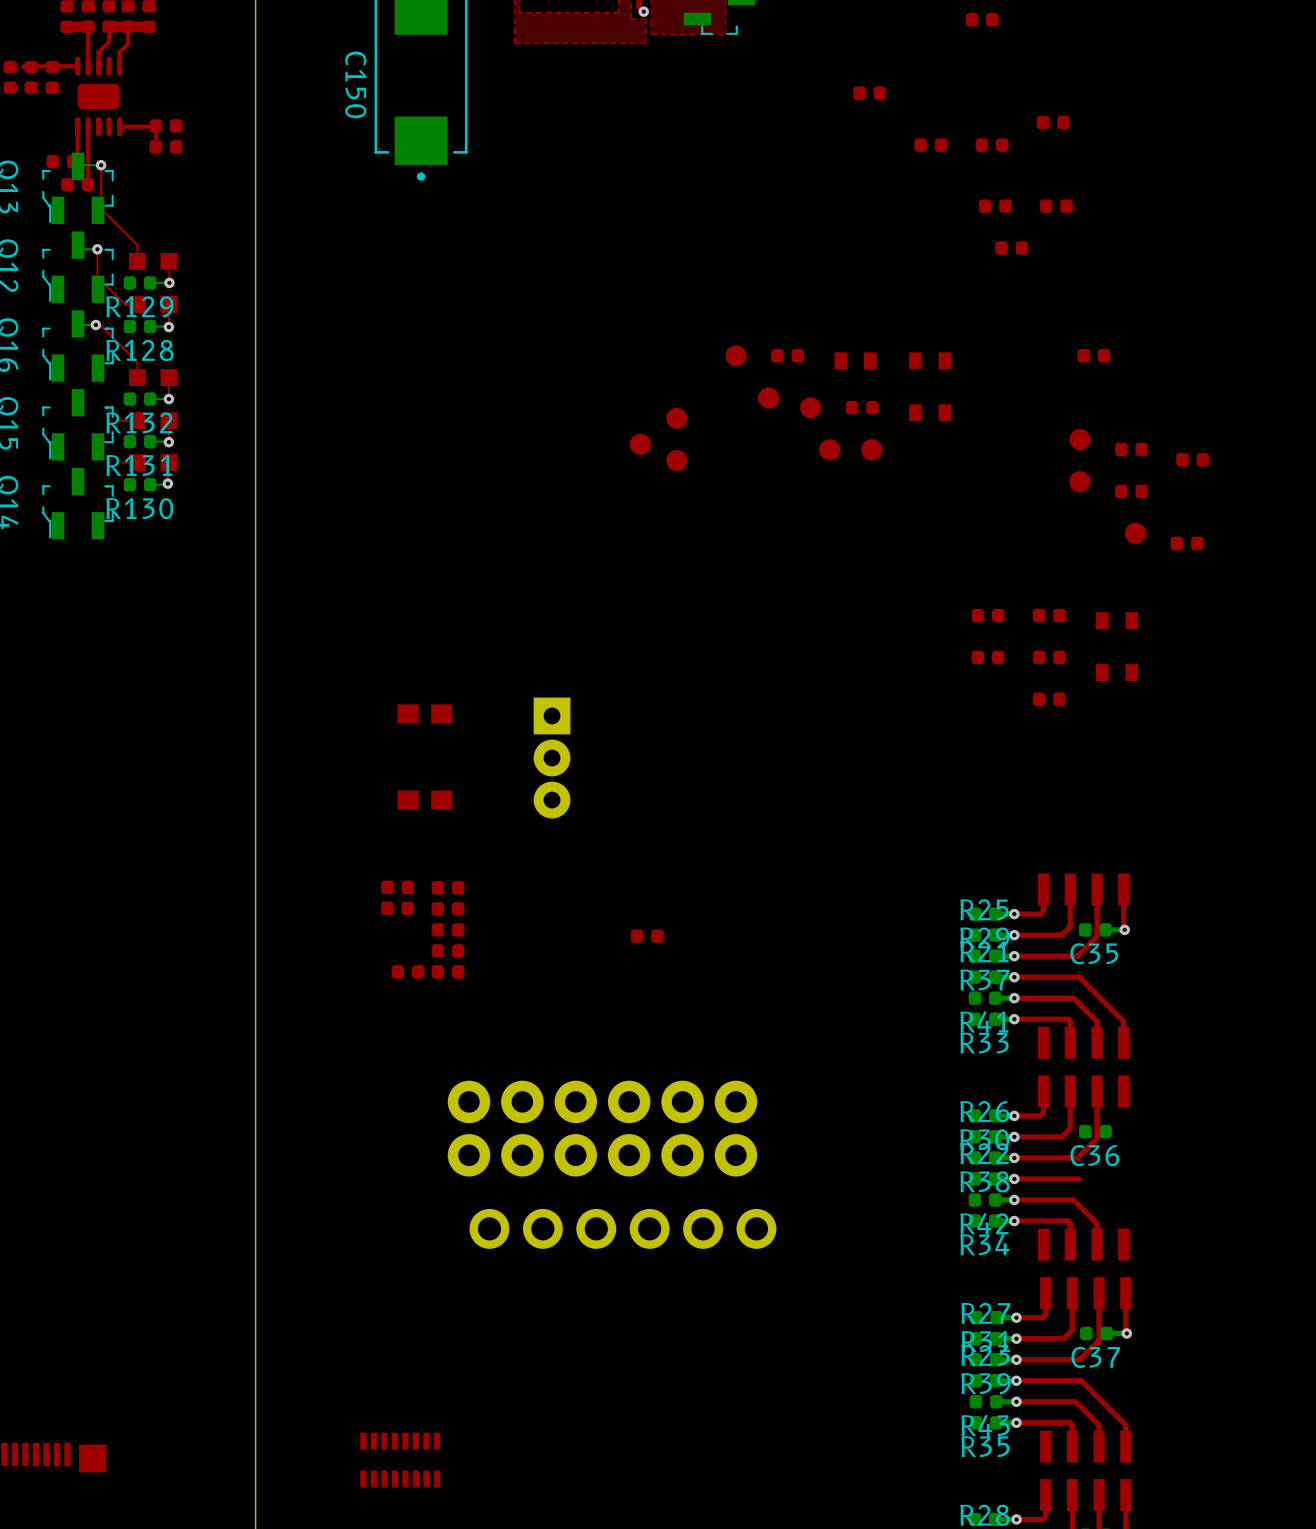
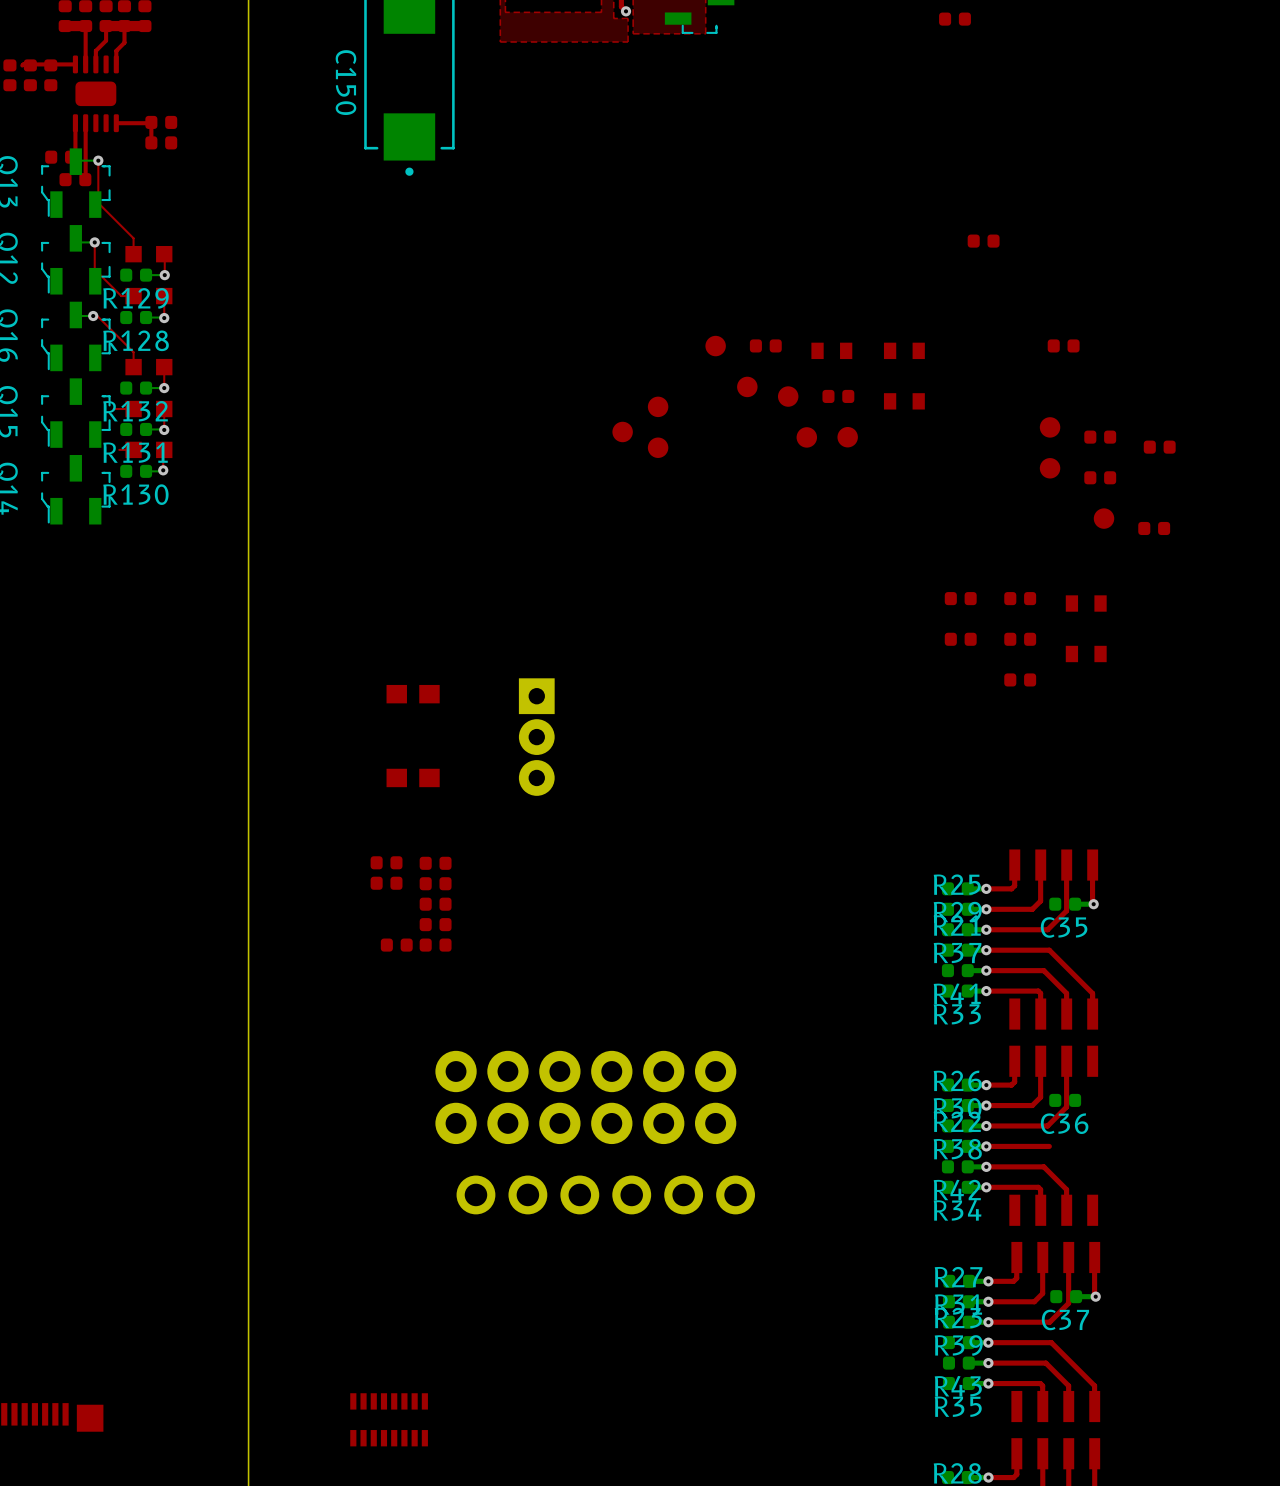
part: (869, 93) -> none
part: (1053, 122) -> none
part: (930, 145) -> none
part: (991, 145) -> none
part: (995, 206) -> none
part: (1056, 206) -> none
part: (647, 936) -> none

